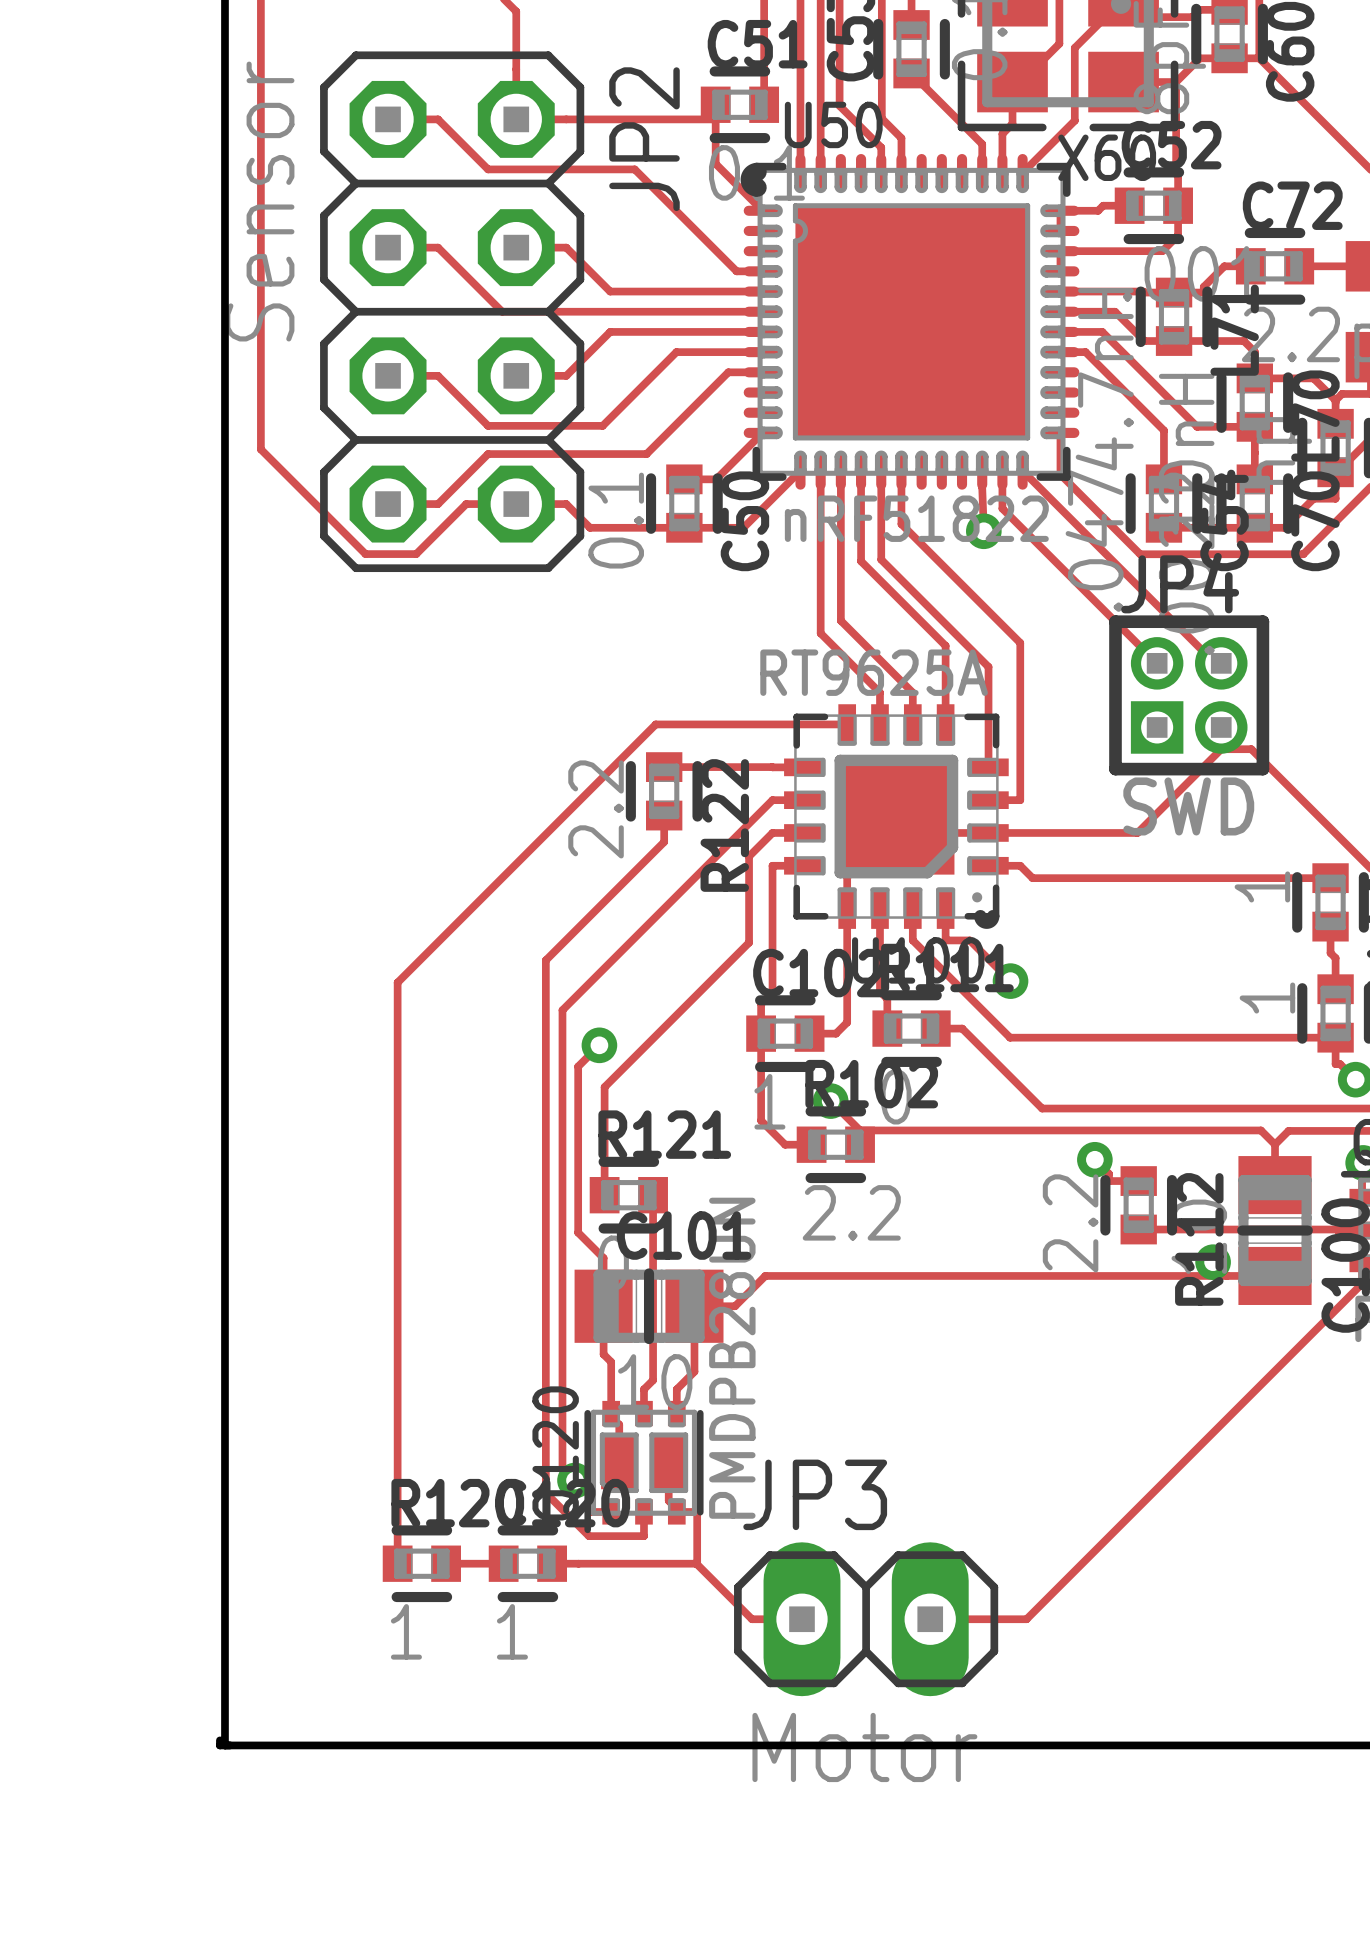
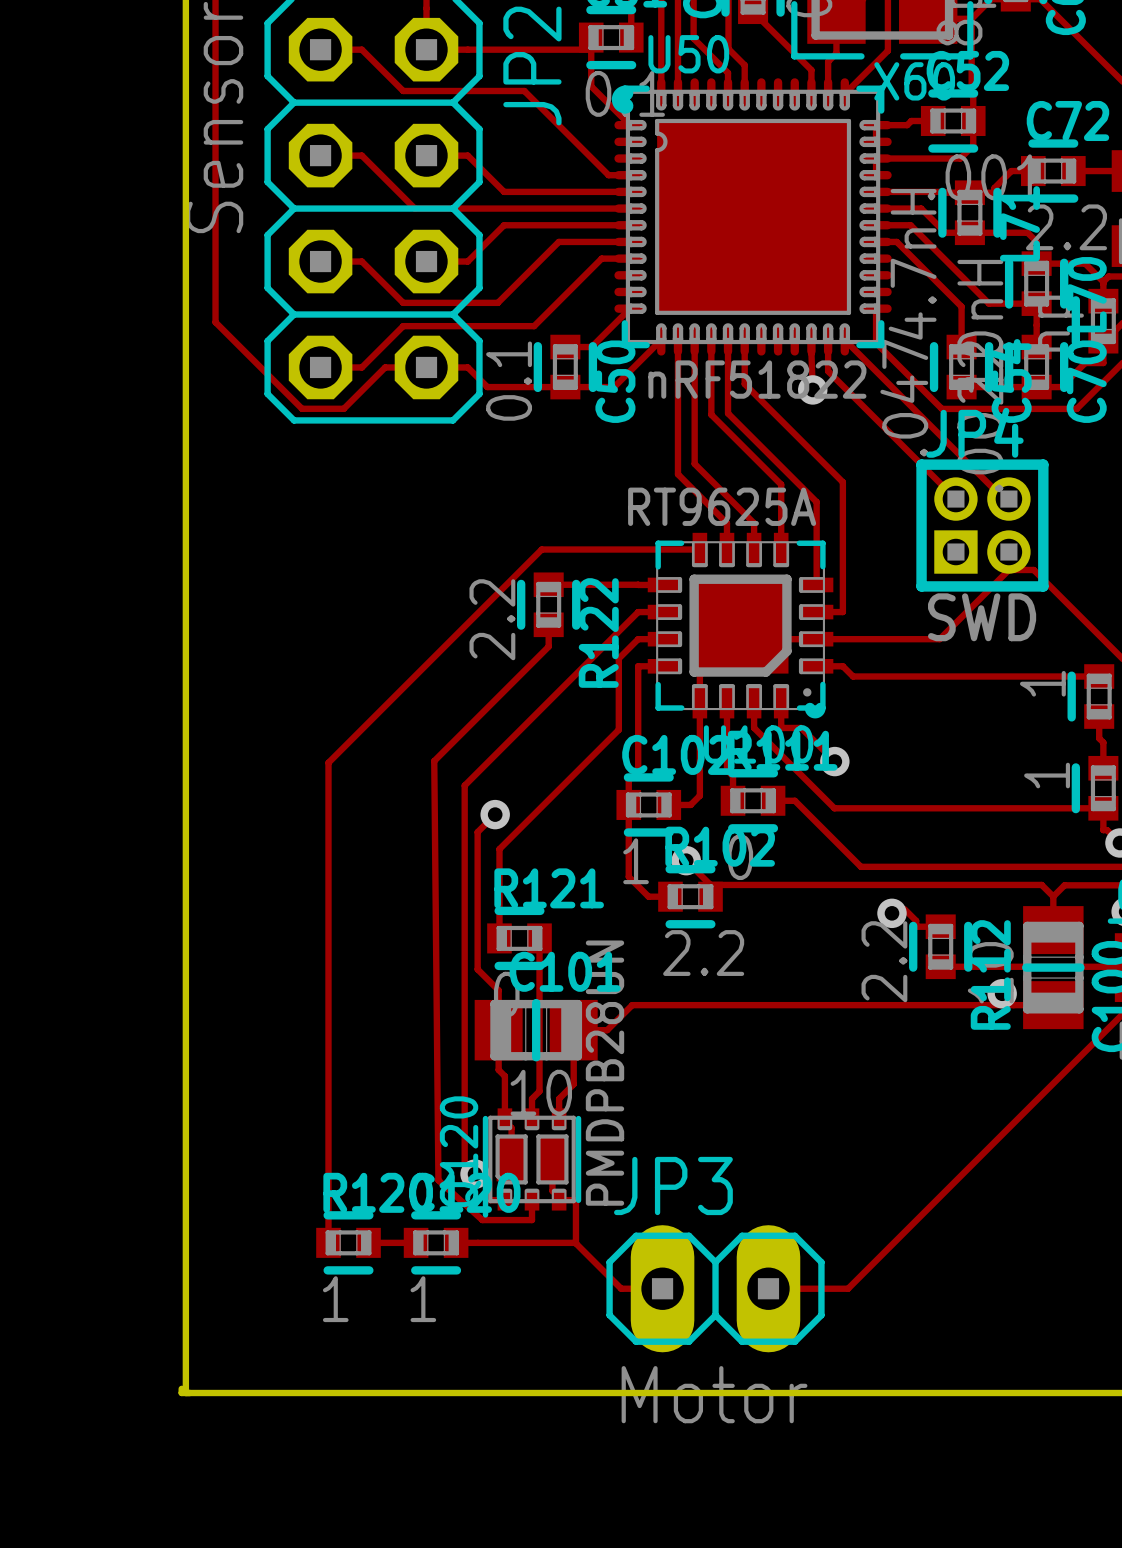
track: (545, 960) (545, 1493) (588, 1536) -> (450, 744) (434, 761) (438, 1180) (482, 1220) (486, 1220)
via position: (1094, 1159) -> (891, 913)

